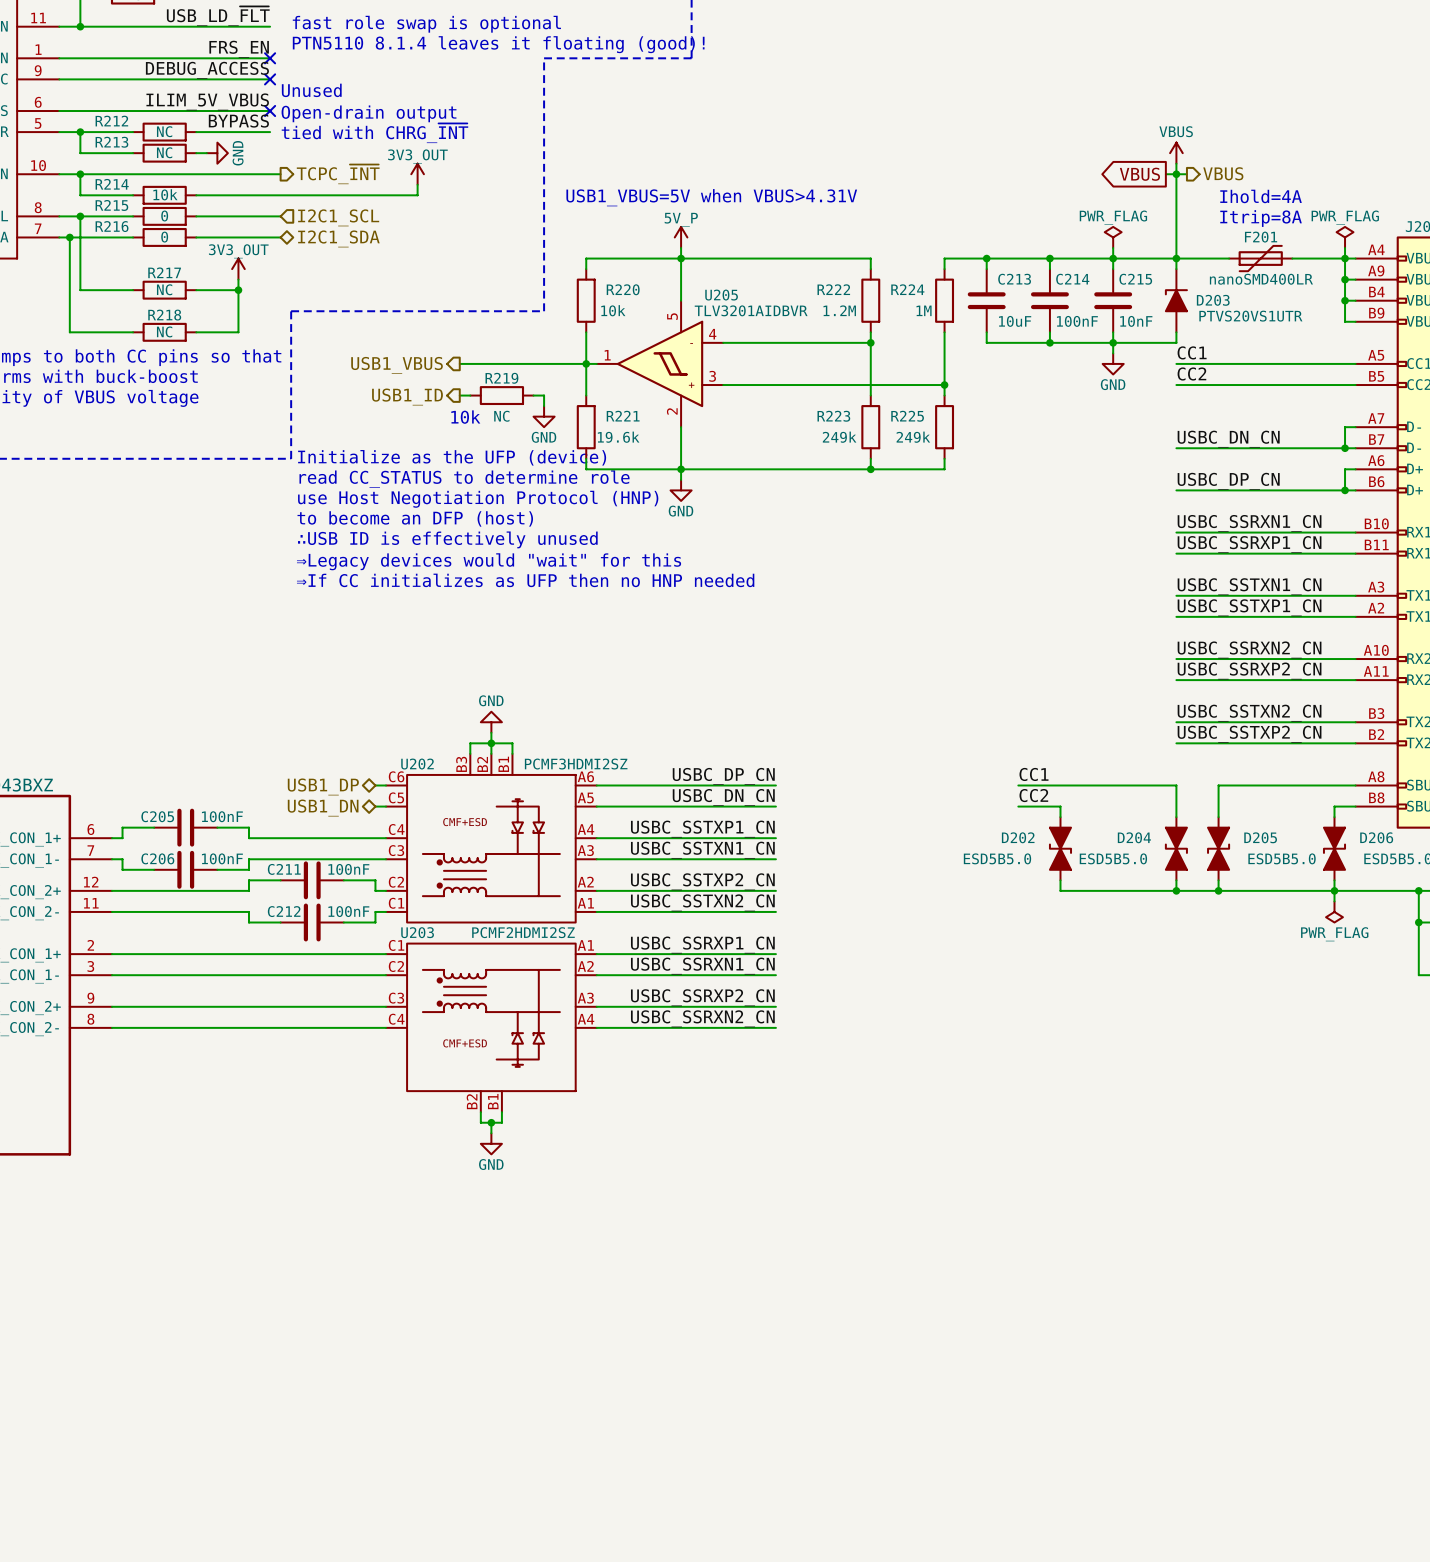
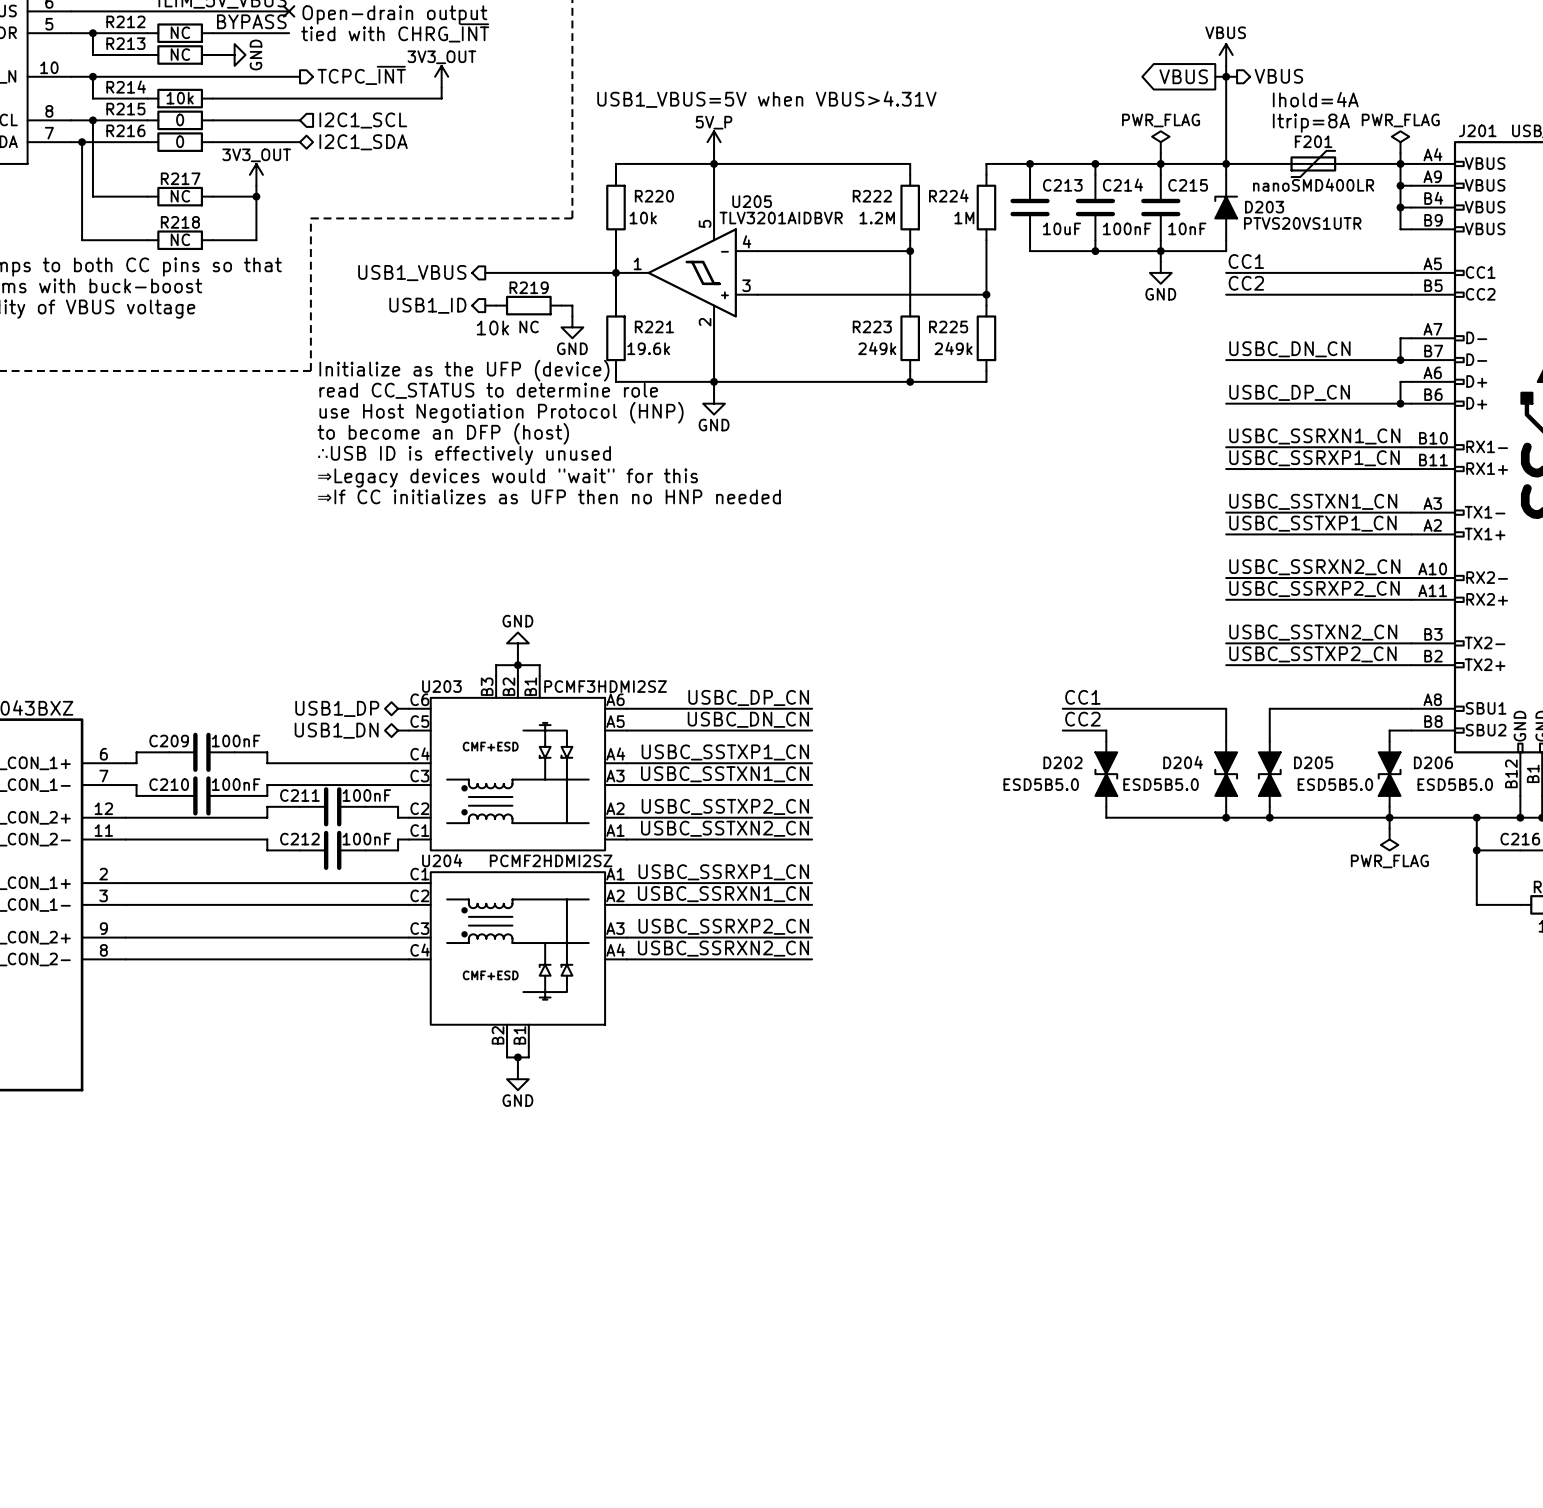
U202 name: U202 (417, 764) -> U203 (441, 686)
C205 name: C205 (157, 816) -> C209 (169, 741)
C206 name: C206 (157, 858) -> C210 (169, 784)
U203 name: U203 (417, 932) -> U204 (442, 860)

